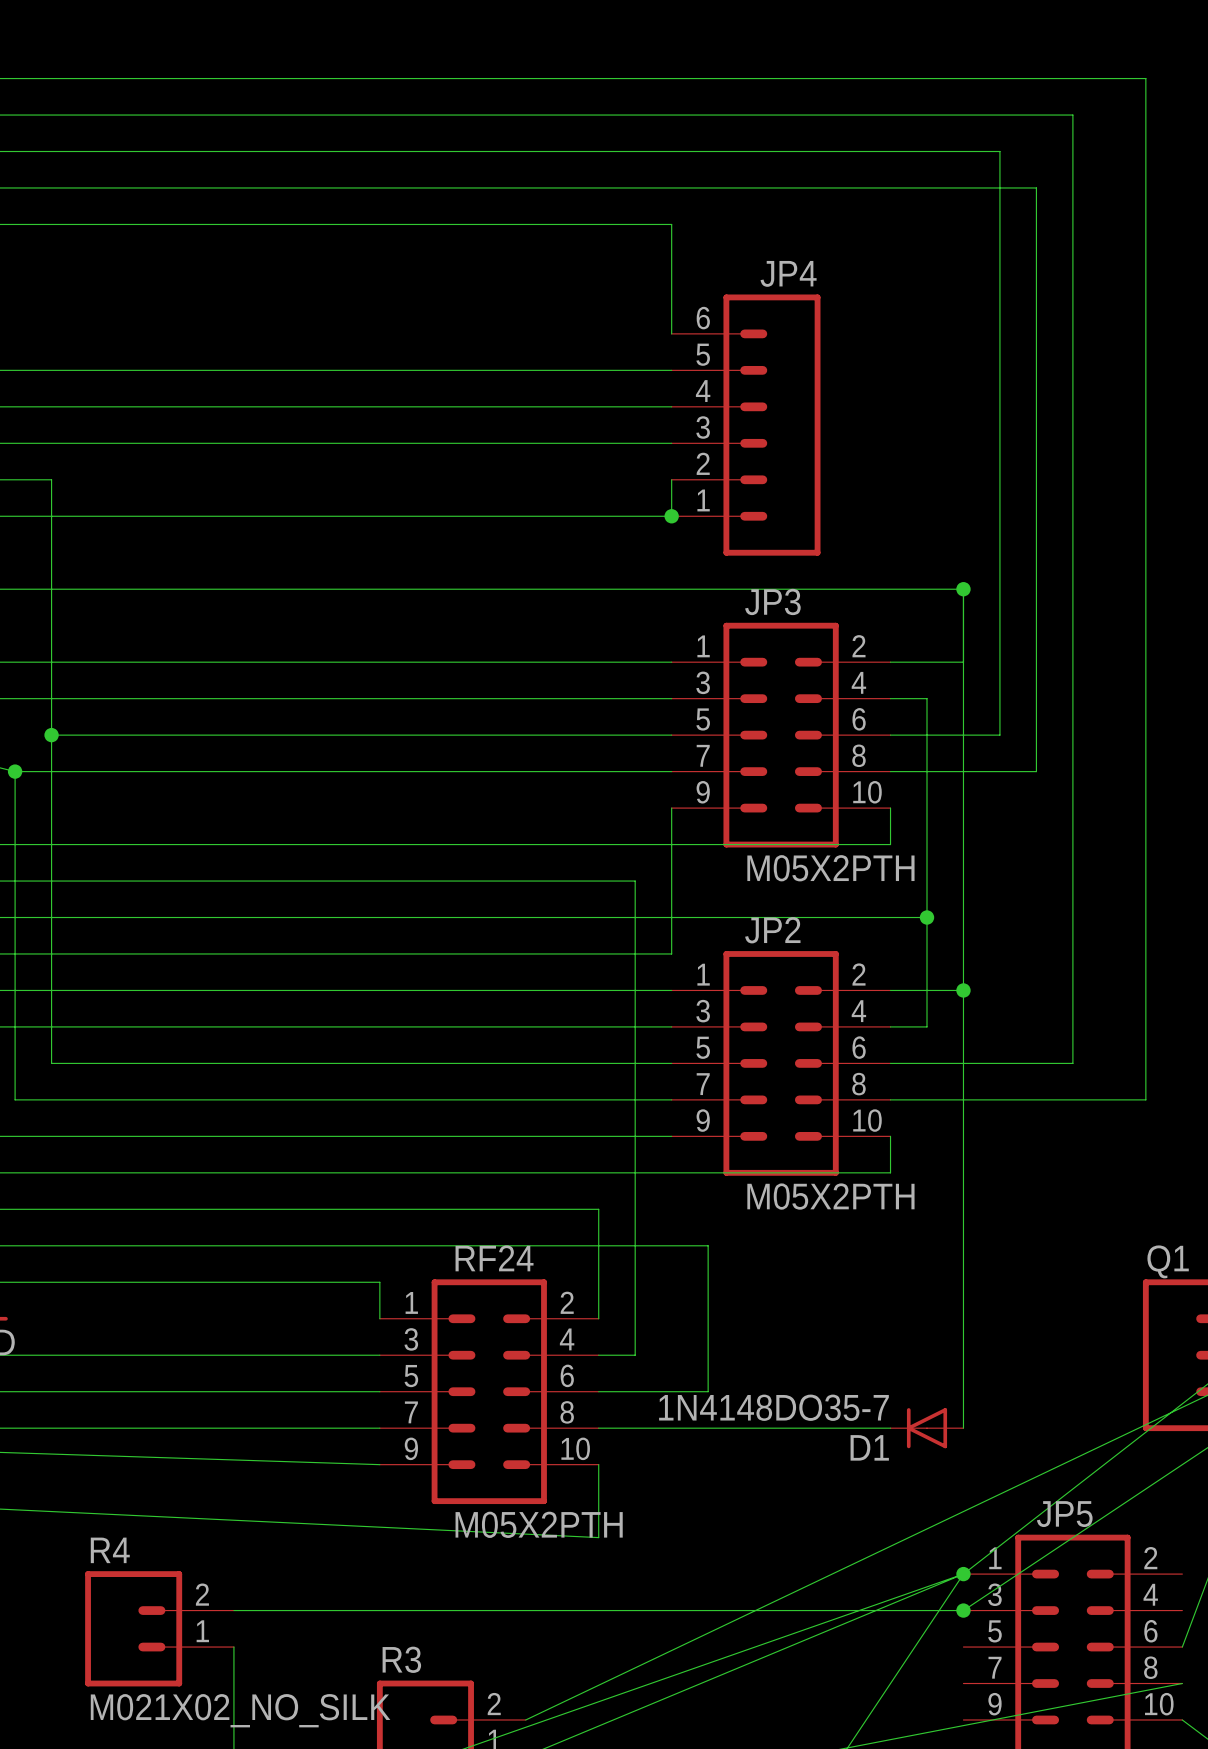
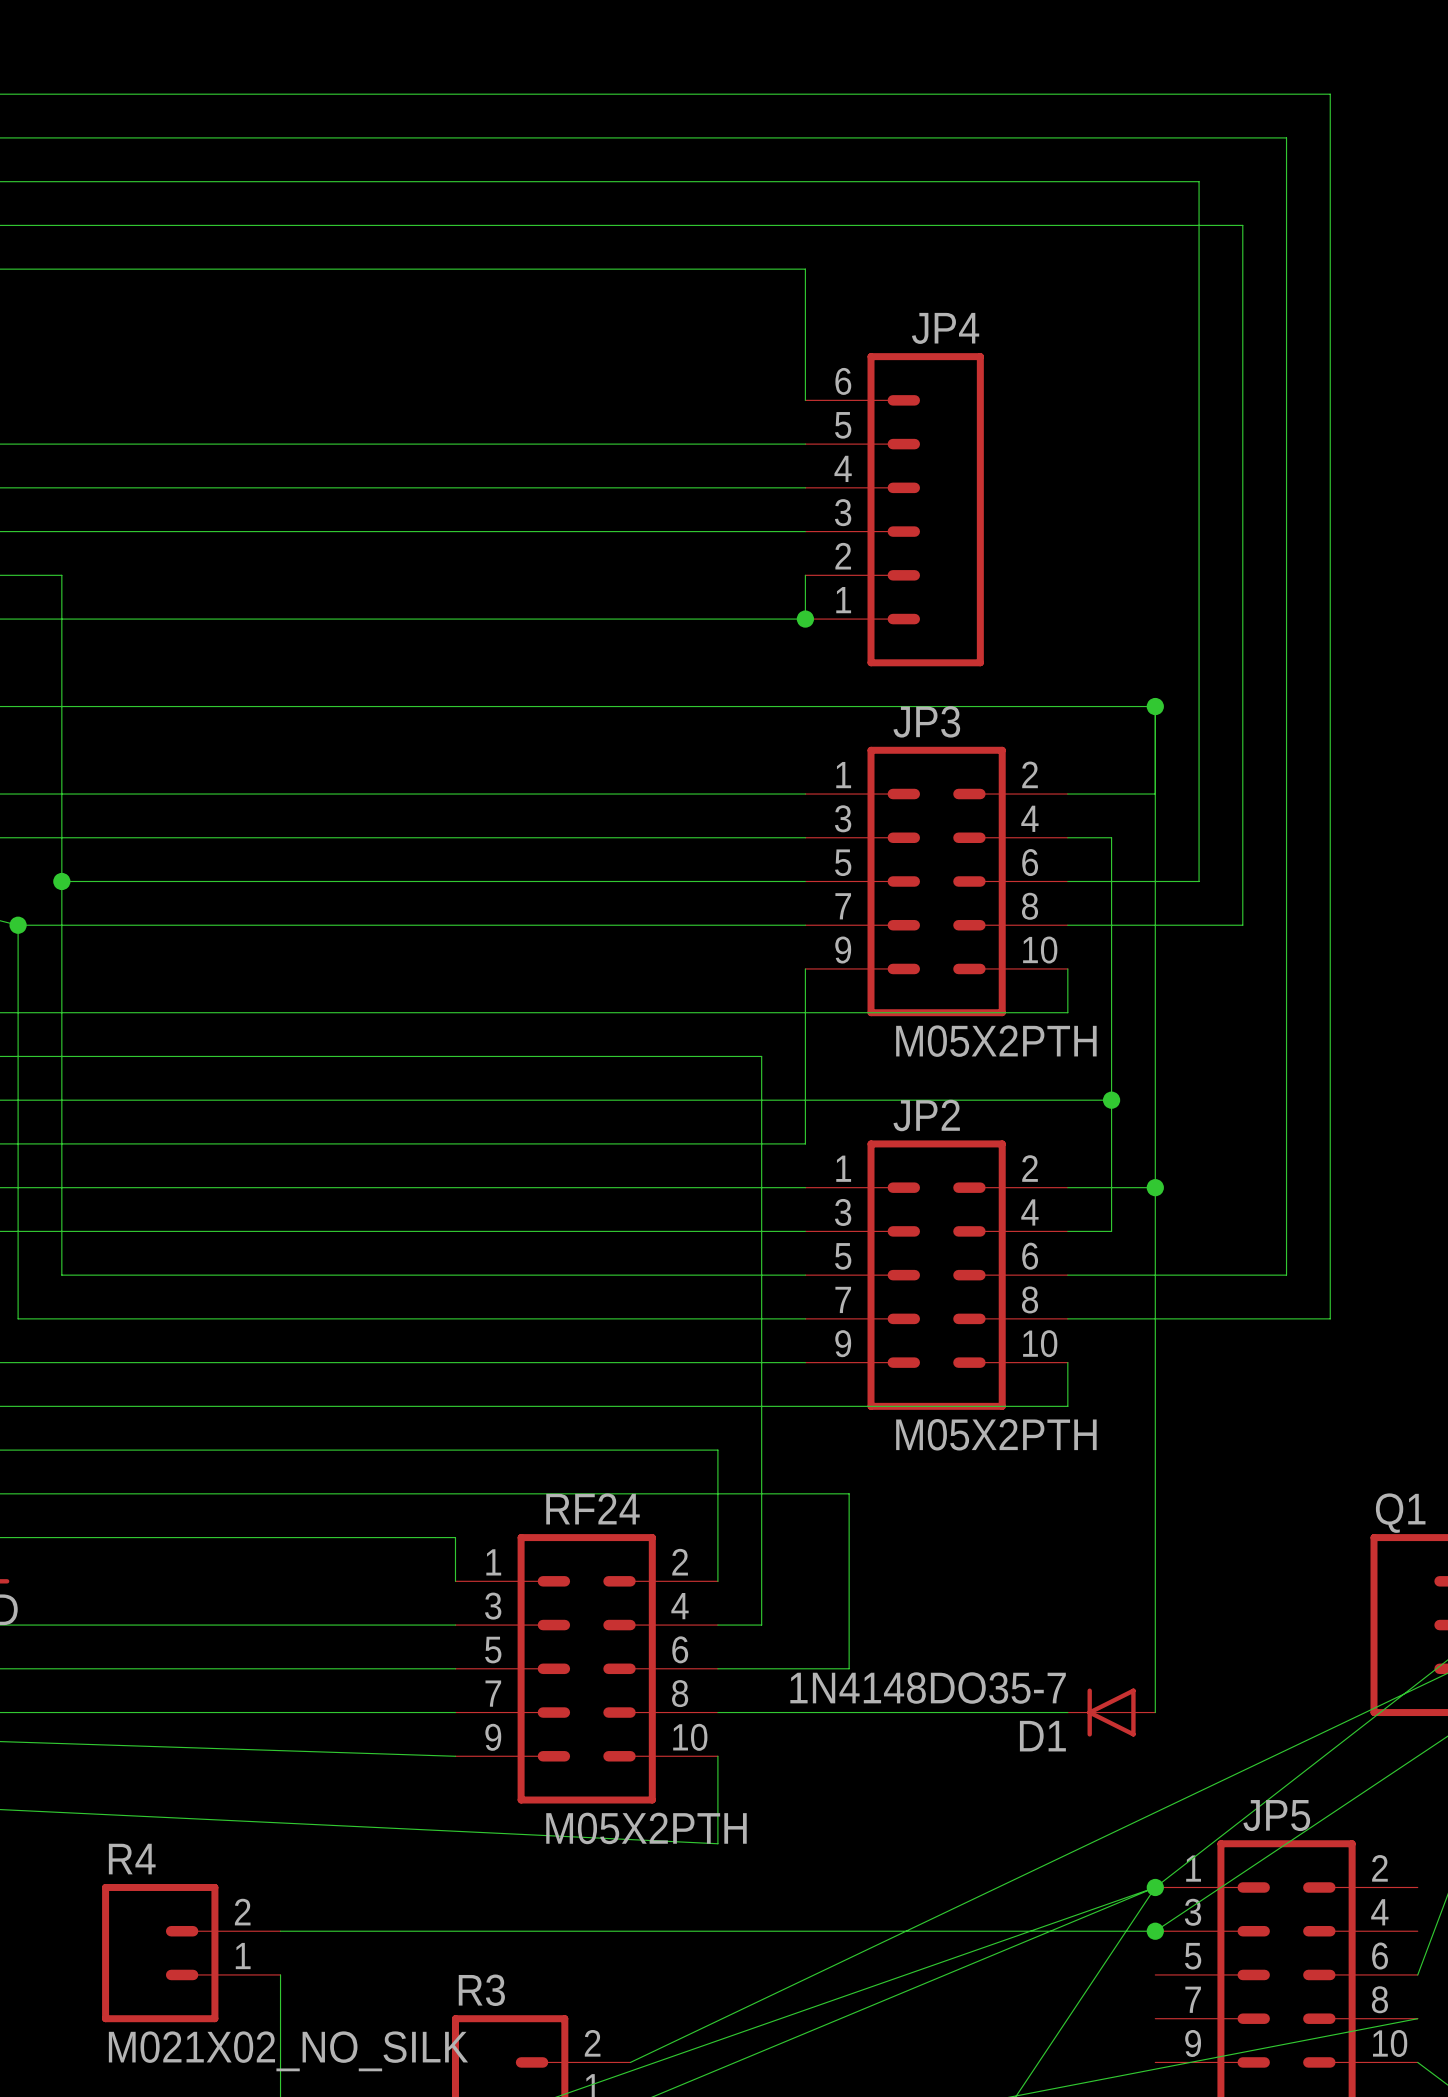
wire: (1109, 78) (1145, 78) (1145, 1099) (1109, 1099) -> (1330, 94) (1330, 1318)

